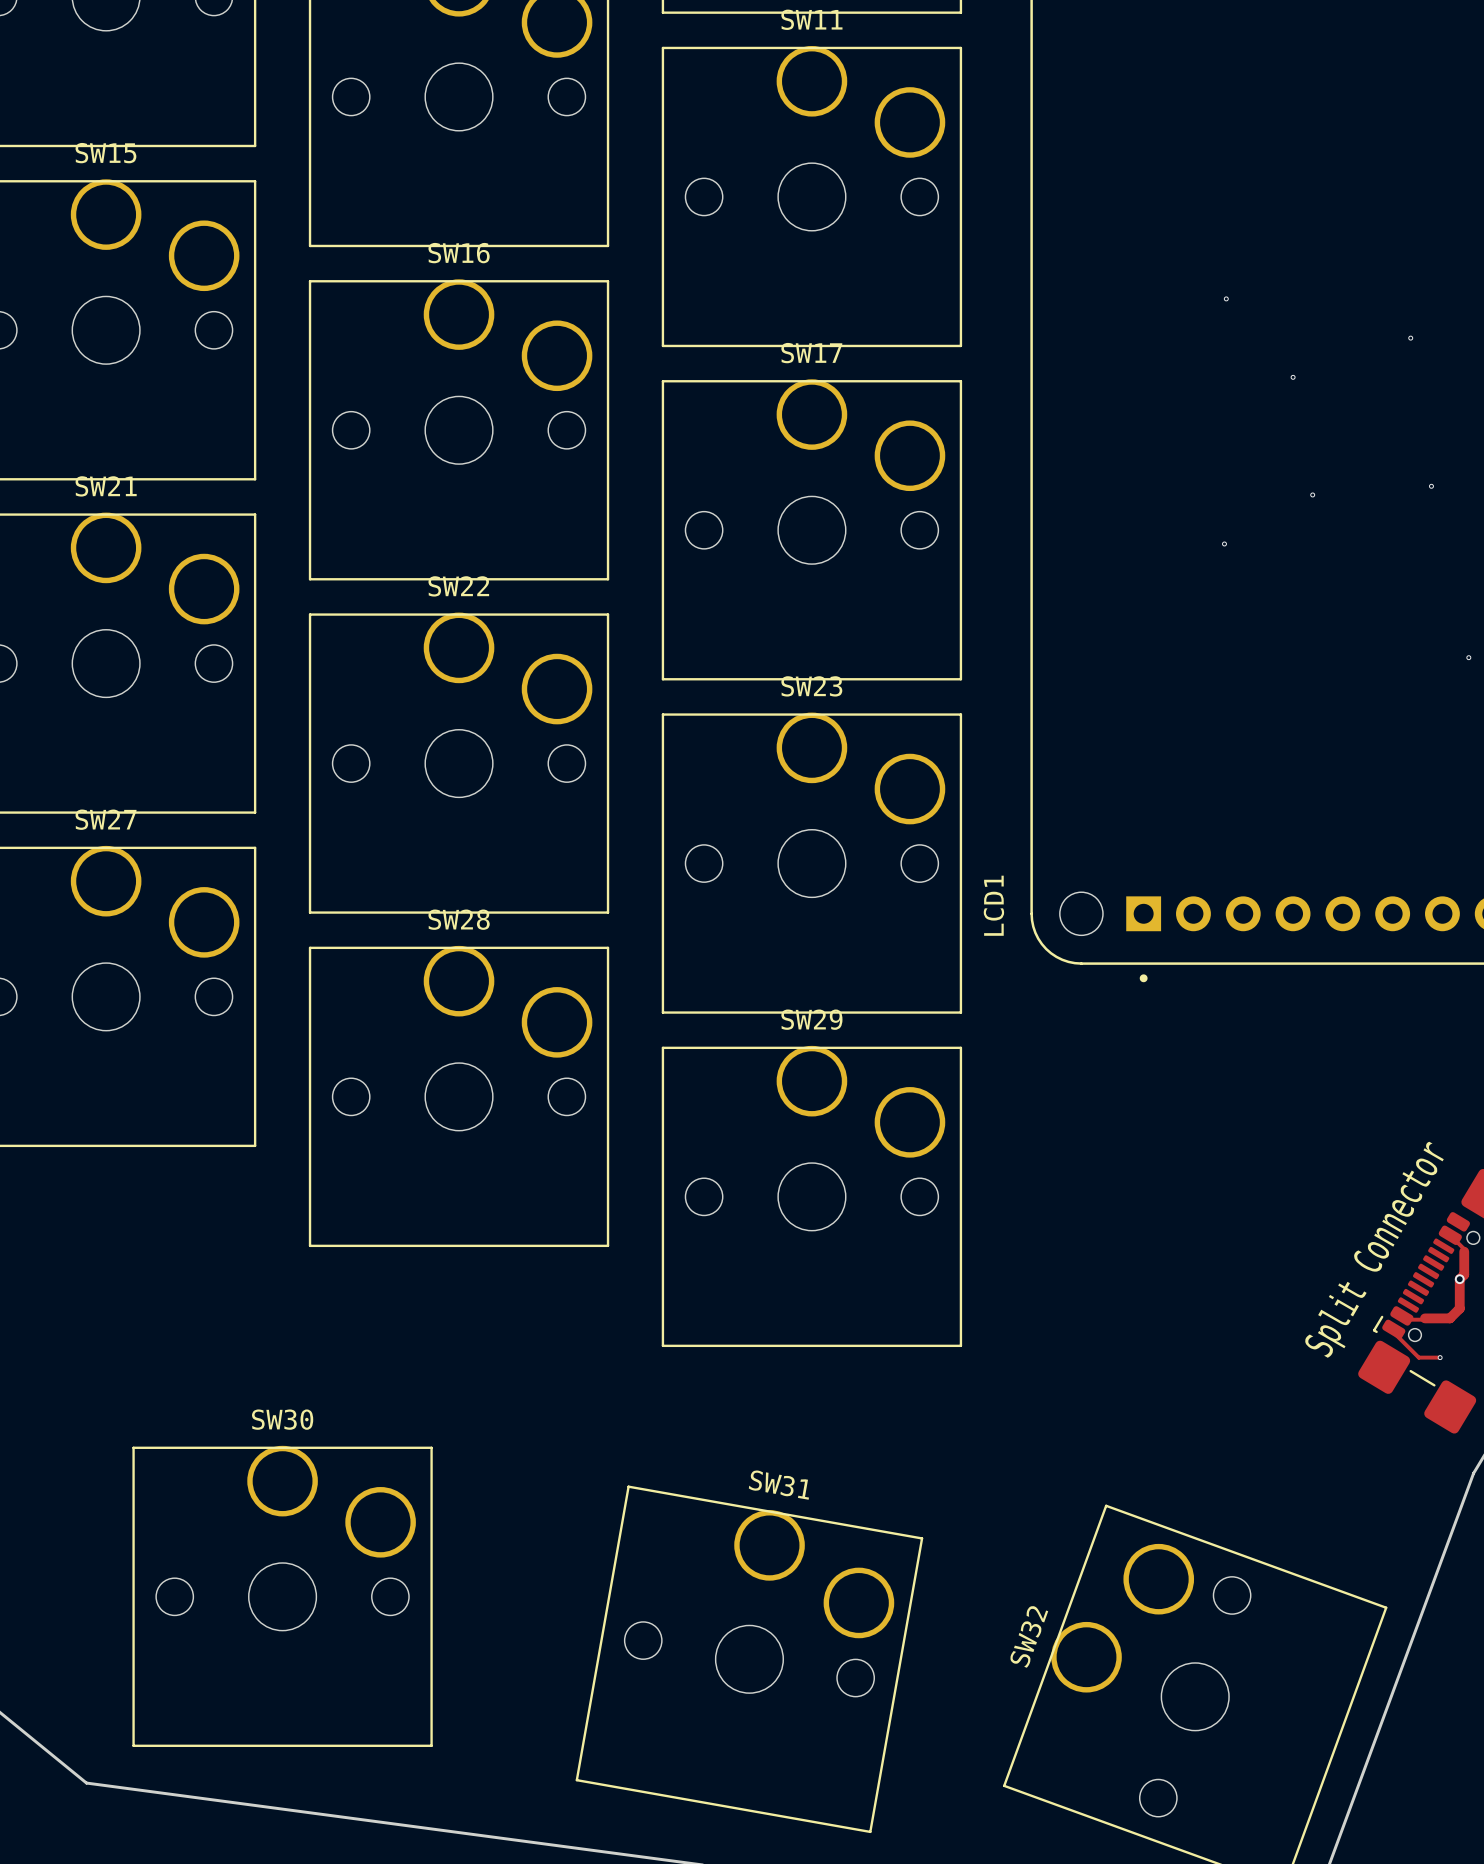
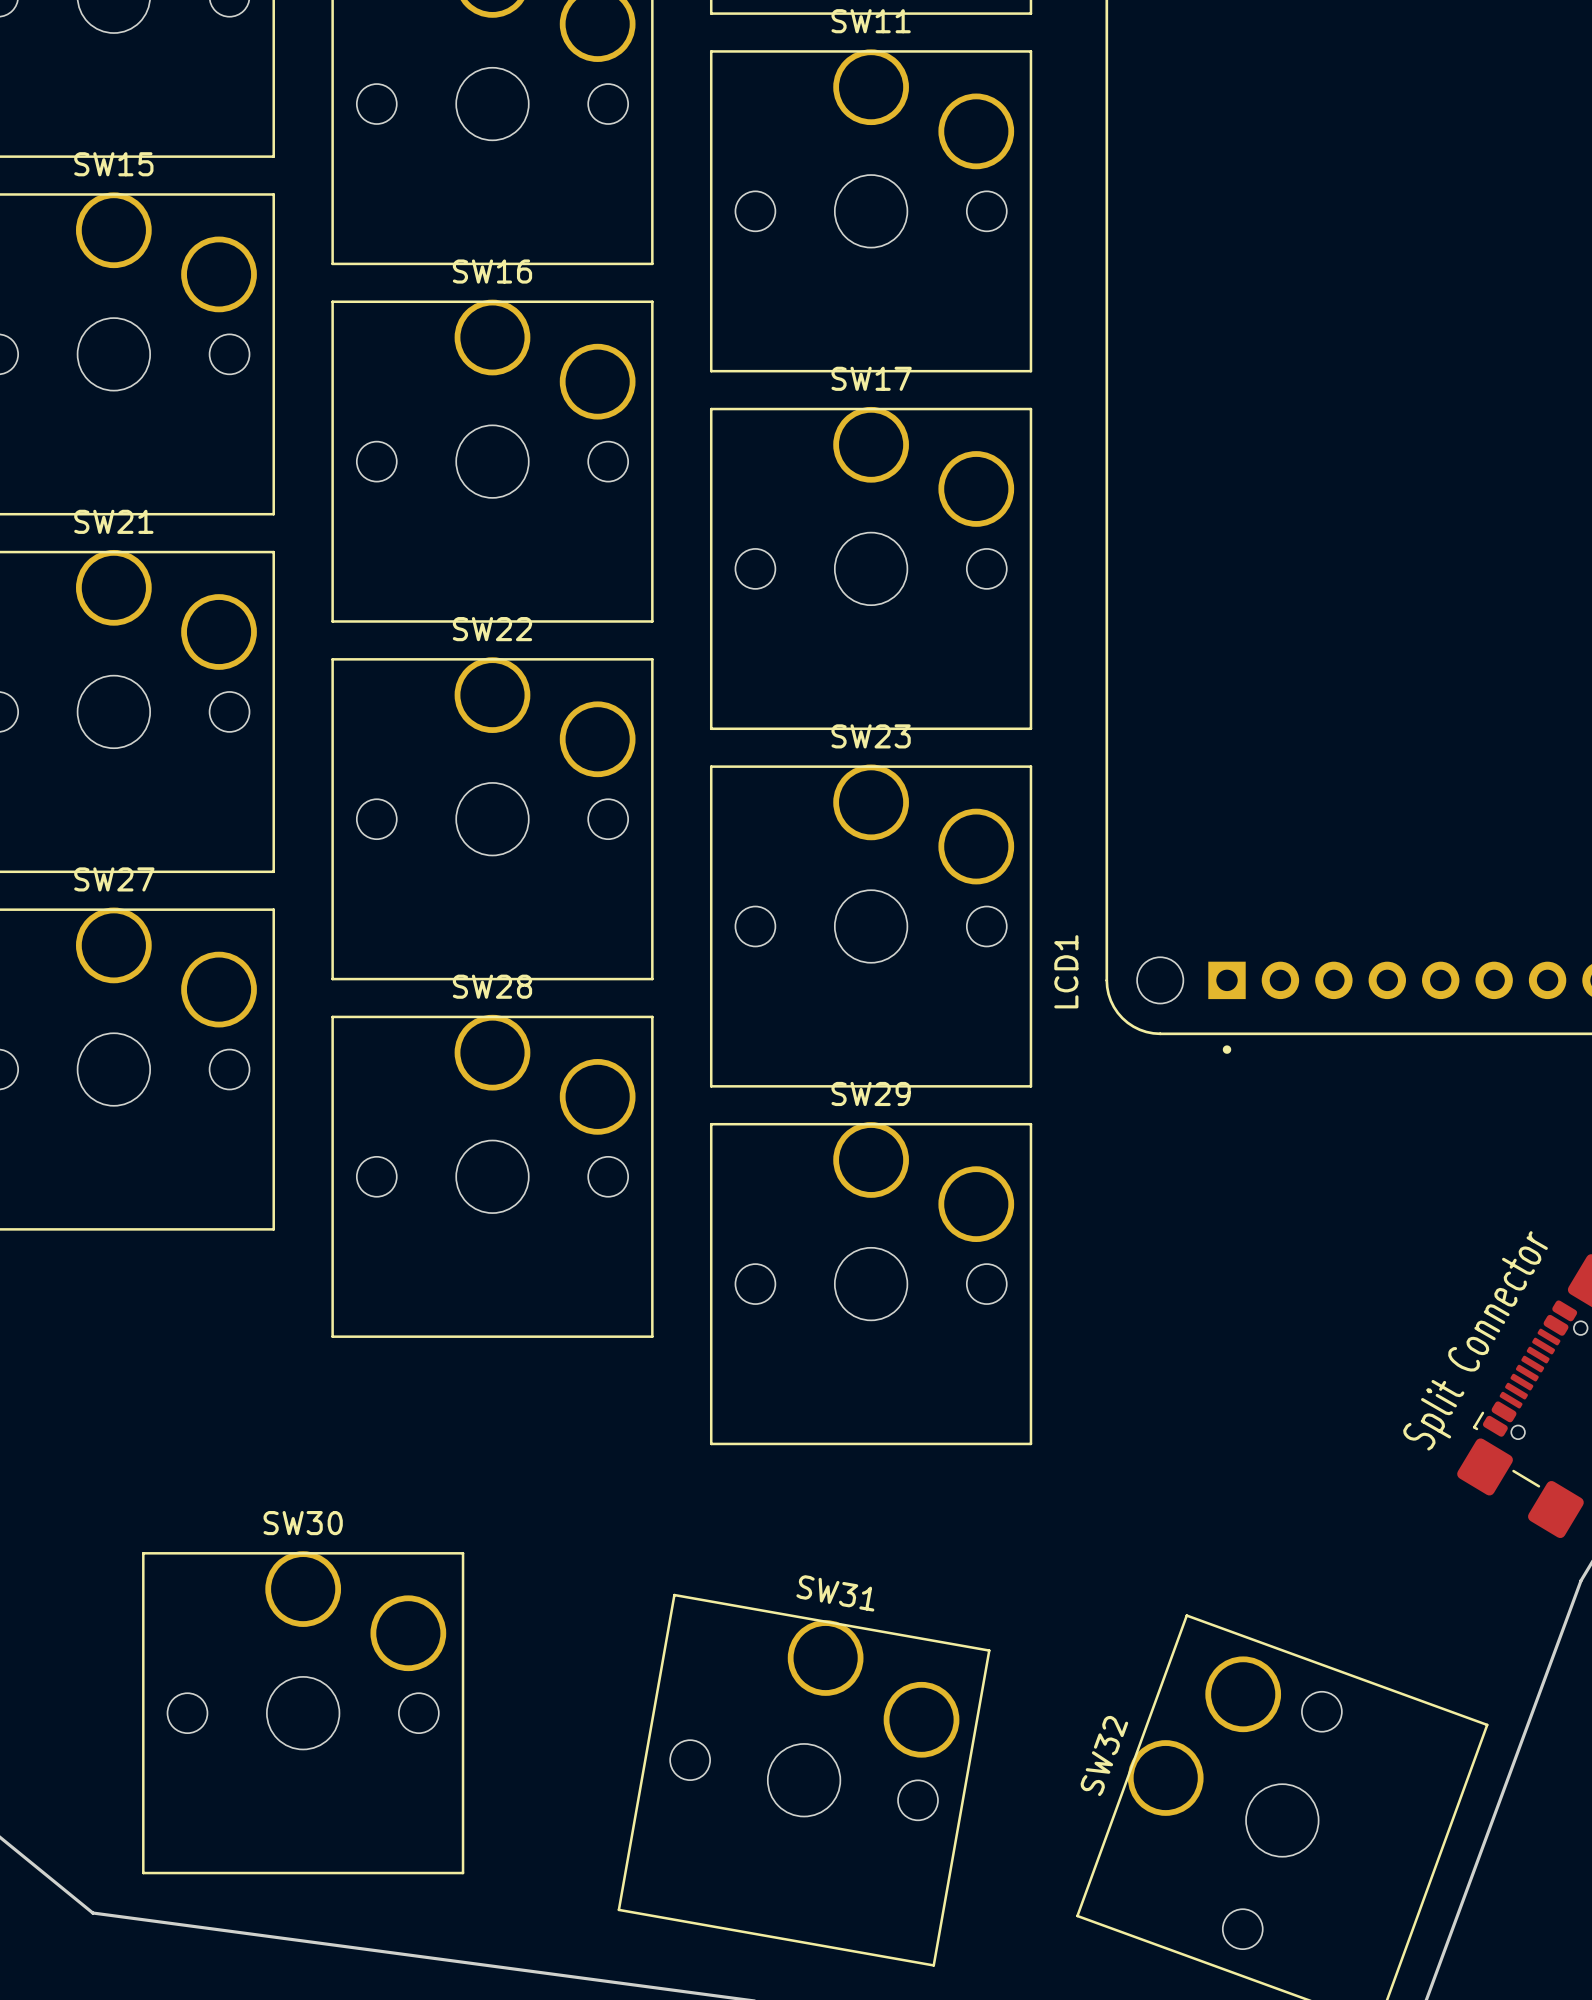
via: (1226, 298) -> none
via: (1410, 338) -> none
via: (1293, 377) -> none
via: (1431, 486) -> none
via: (1312, 494) -> none
via: (1224, 543) -> none
via: (1468, 657) -> none
track: (1450, 1235) (1464, 1249) (1464, 1274) (1459, 1279) (1459, 1308) (1449, 1318) (1405, 1319) (1401, 1315) -> none
via: (1459, 1279) -> none
track: (1393, 1329) (1393, 1332) (1418, 1357) (1440, 1357) -> none
via: (1440, 1357) -> none

